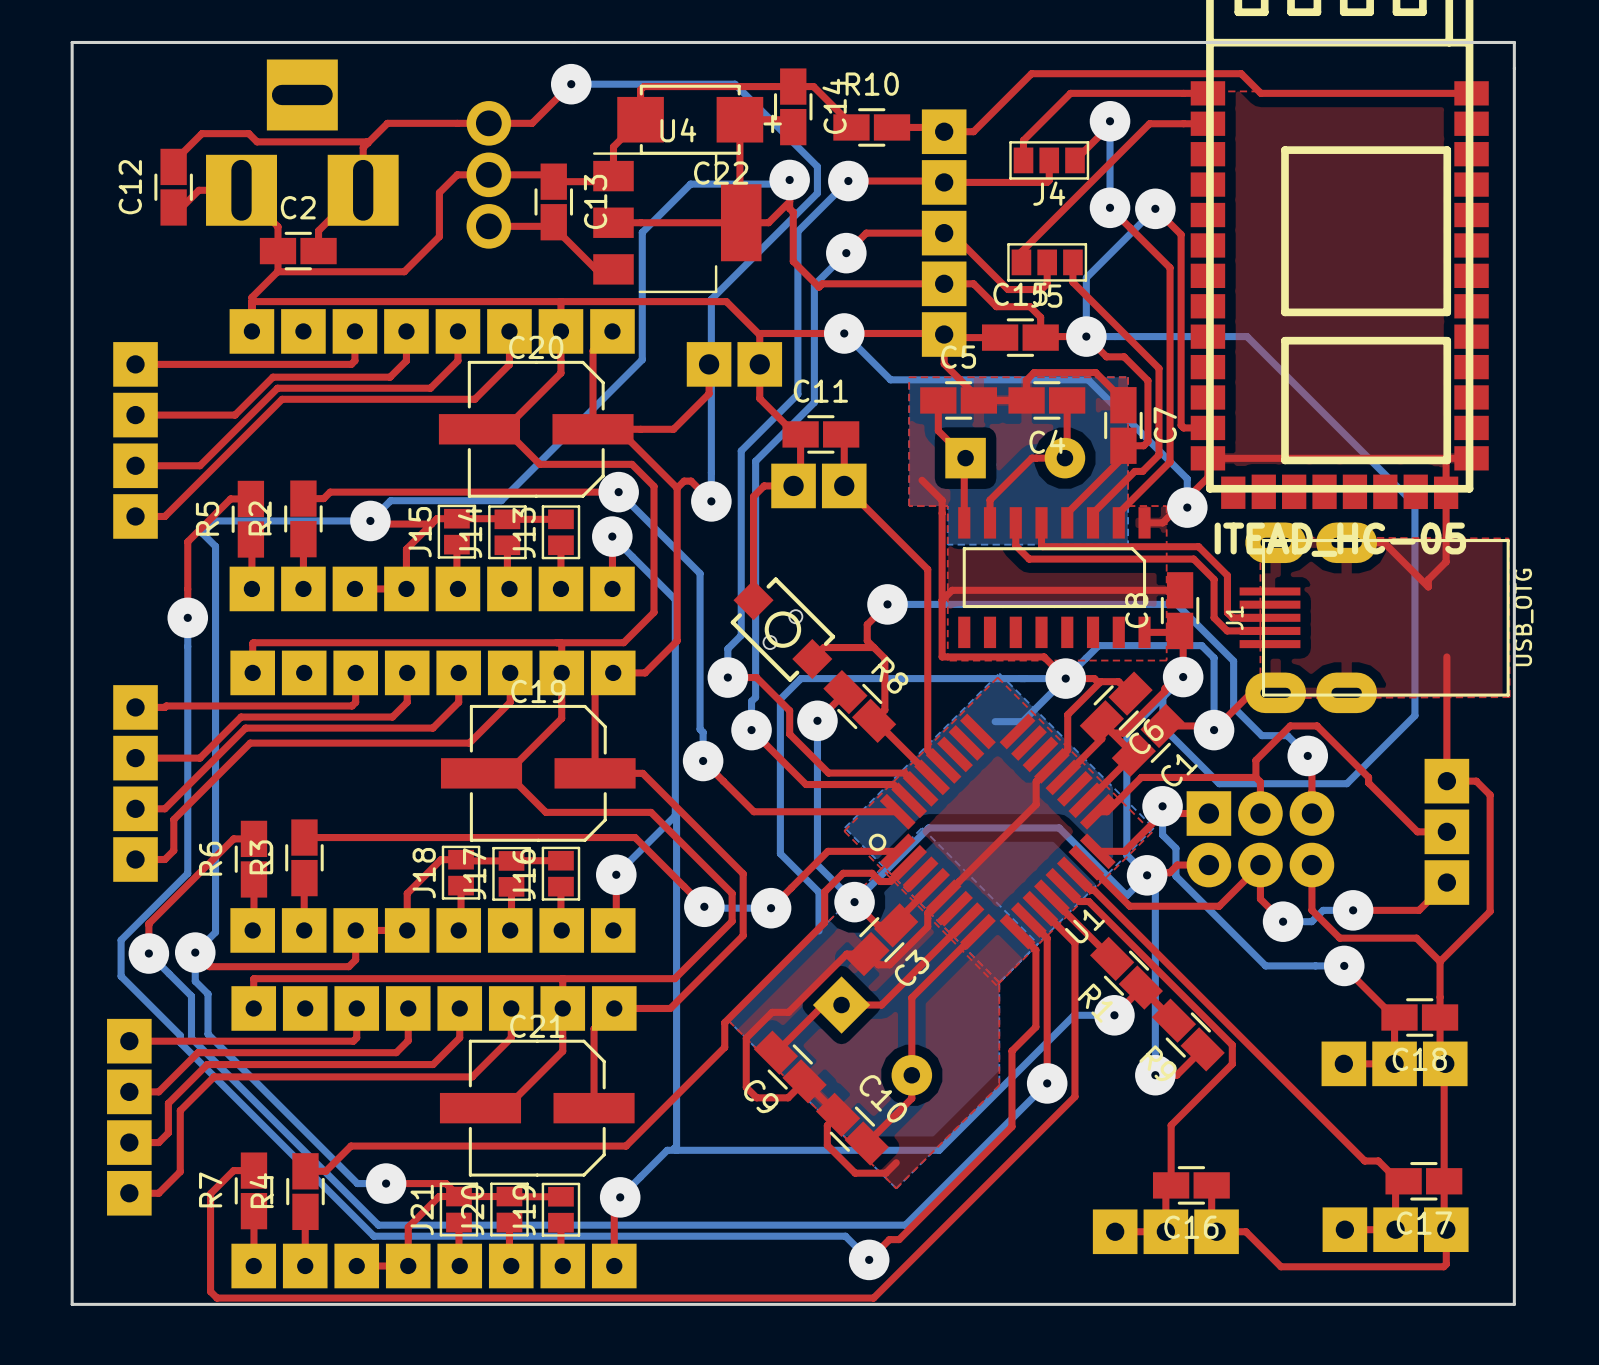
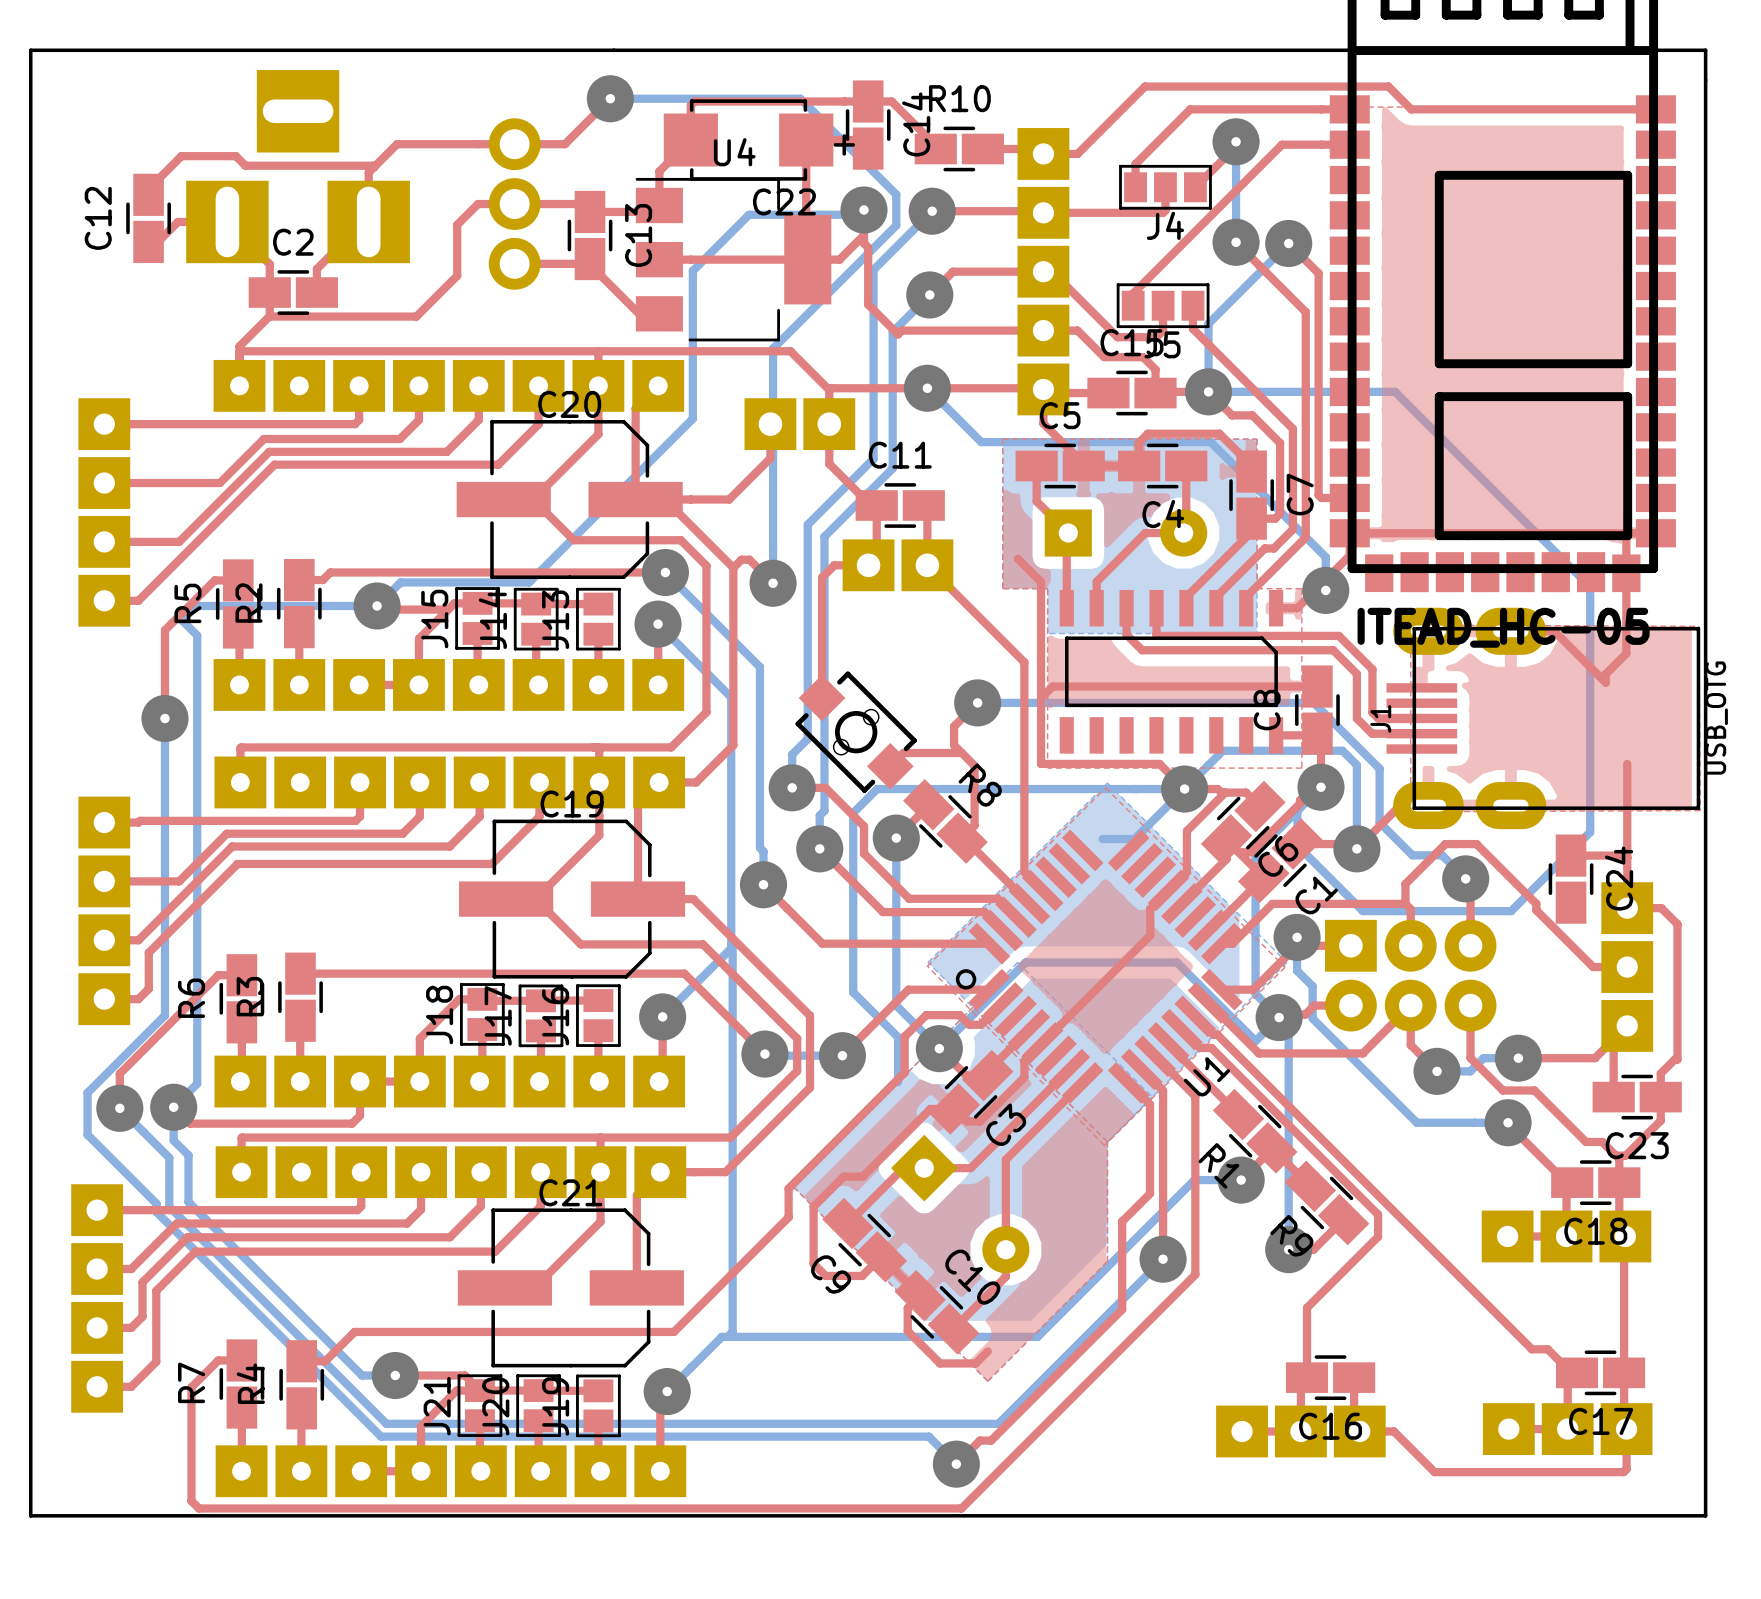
top track: none -> (1571, 855) (1625, 855) (1627, 857)
C24: none -> (1571, 879)
top track: none -> (1613, 1039) (1613, 1097)
top track: (1490, 911) (1440, 961) -> (1677, 1059) (1674, 1059) (1660, 1073) (1660, 1120) (1625, 1155) (1615, 1155)
top track: (1367, 938) (1416, 938) (1440, 961) -> (1534, 1090) (1585, 1141) (1602, 1141) (1619, 1159)
C23: none -> (1637, 1097)
top track: (1440, 961) (1440, 997) -> none

